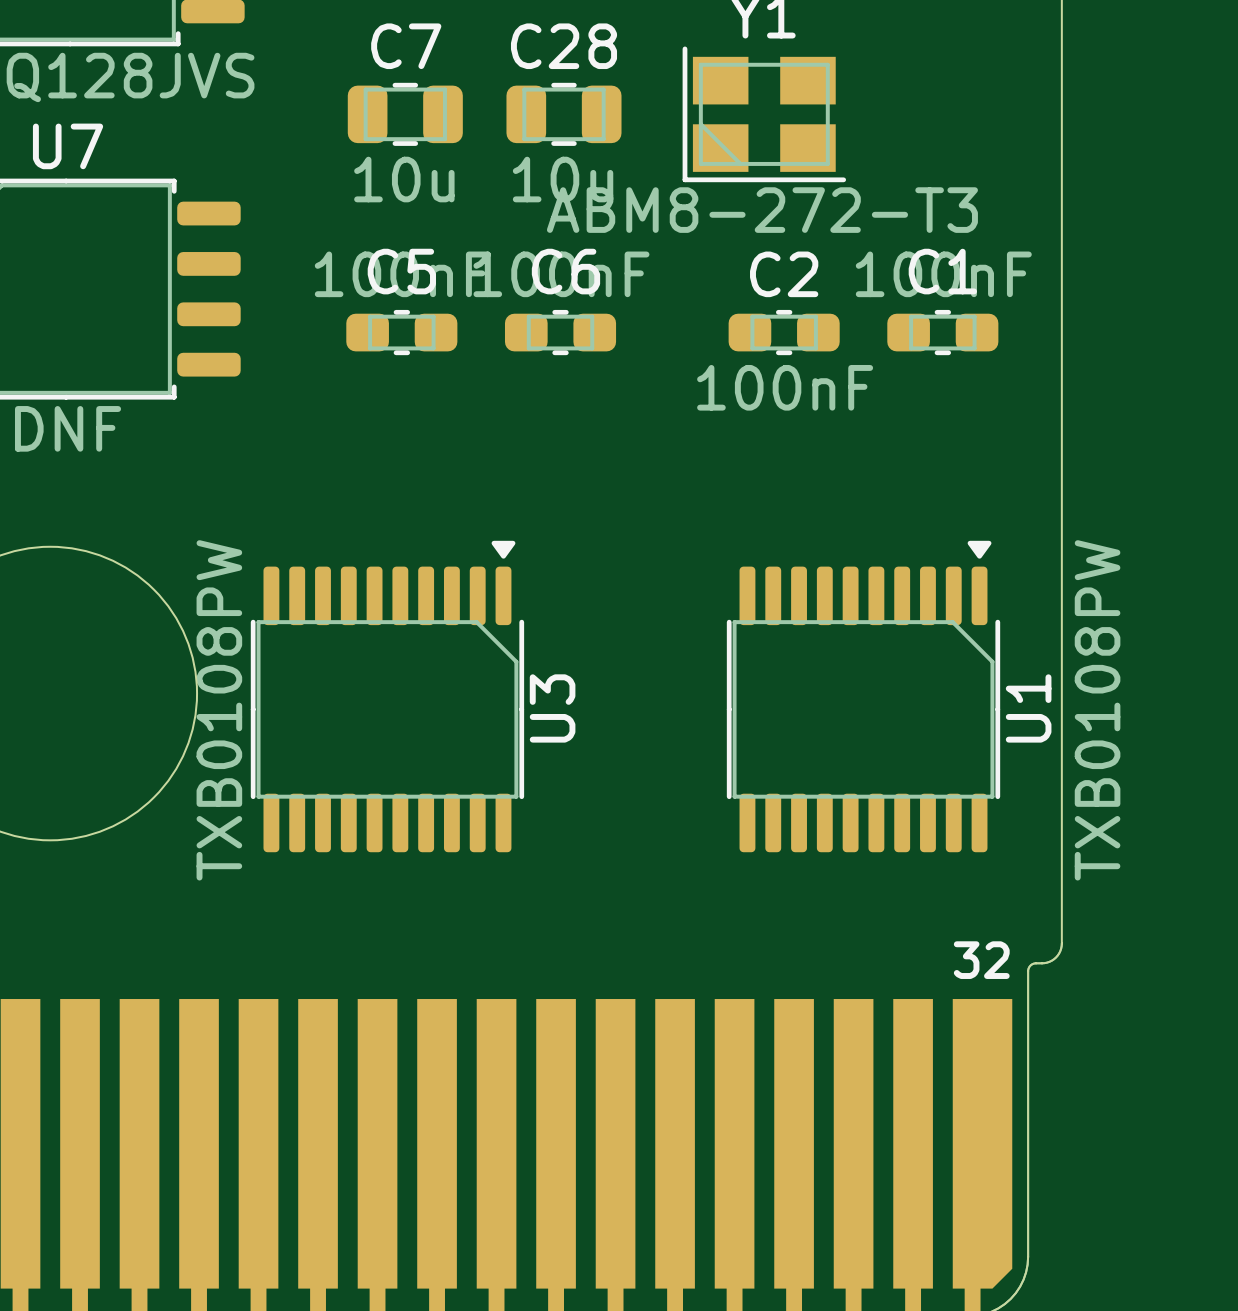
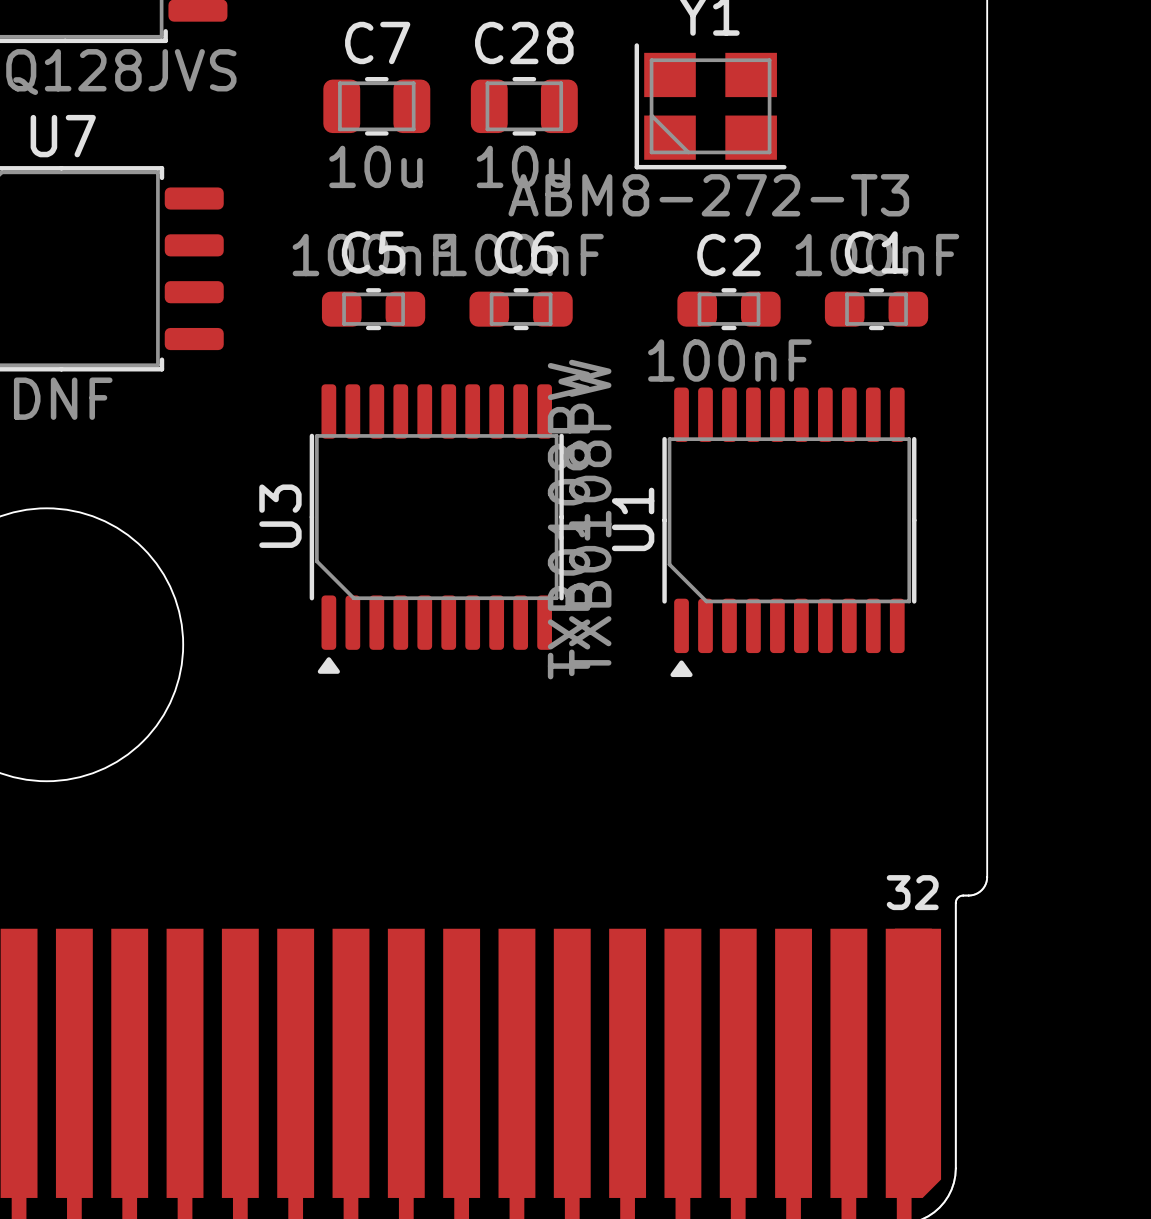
U3 rotation: 0° (387, 696) -> 180° (436, 529)
U1 rotation: 0° (863, 696) -> 180° (789, 532)

